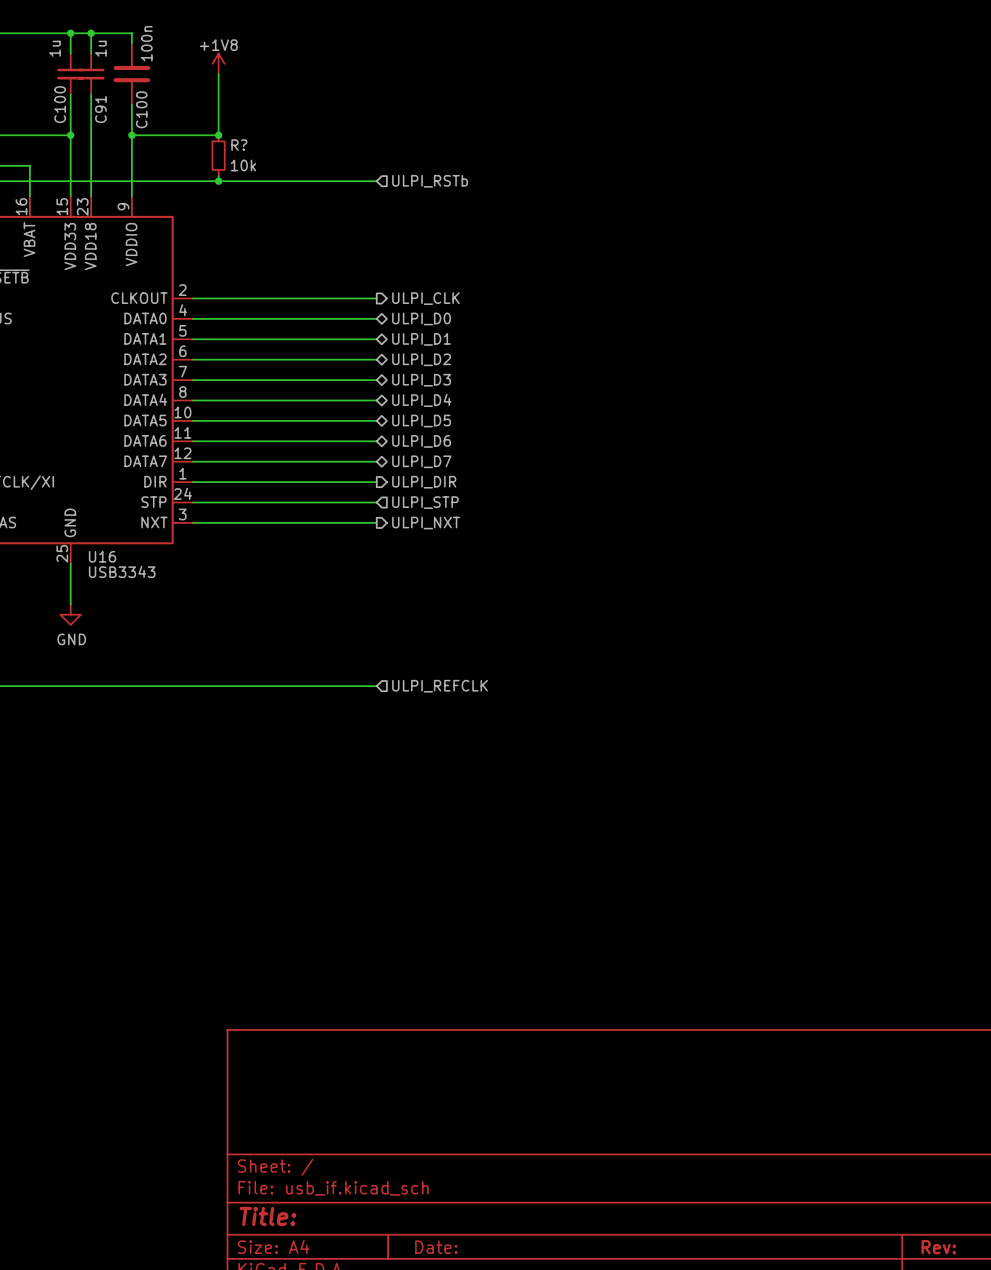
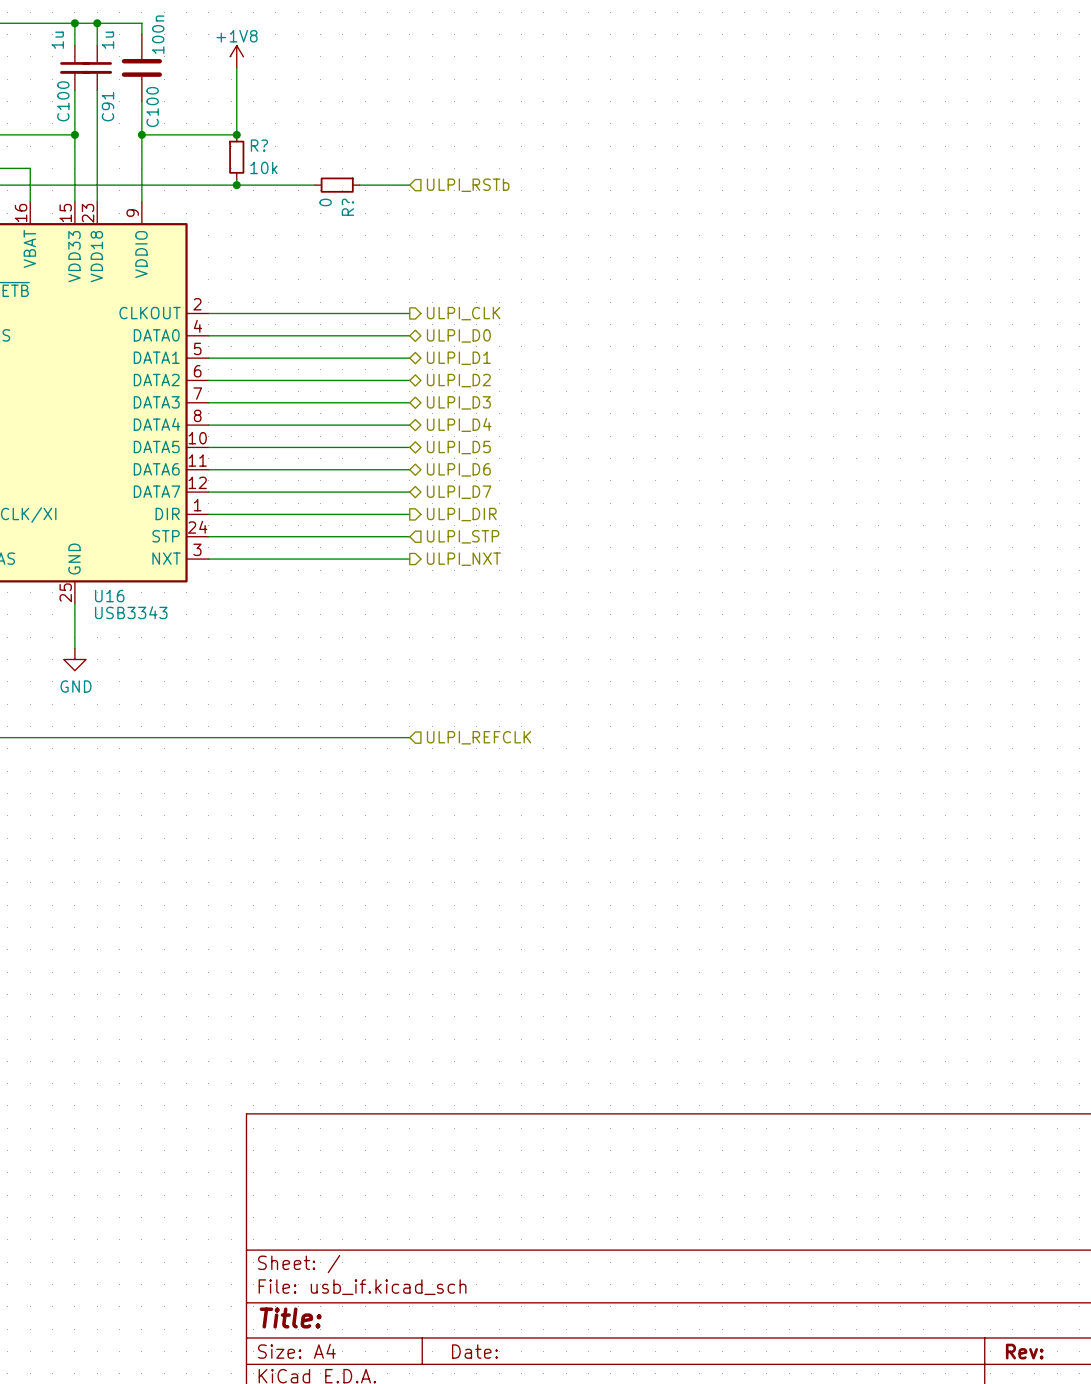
wire: (290, 181) (330, 181) -> none
R?: none -> 0 (337, 185)

